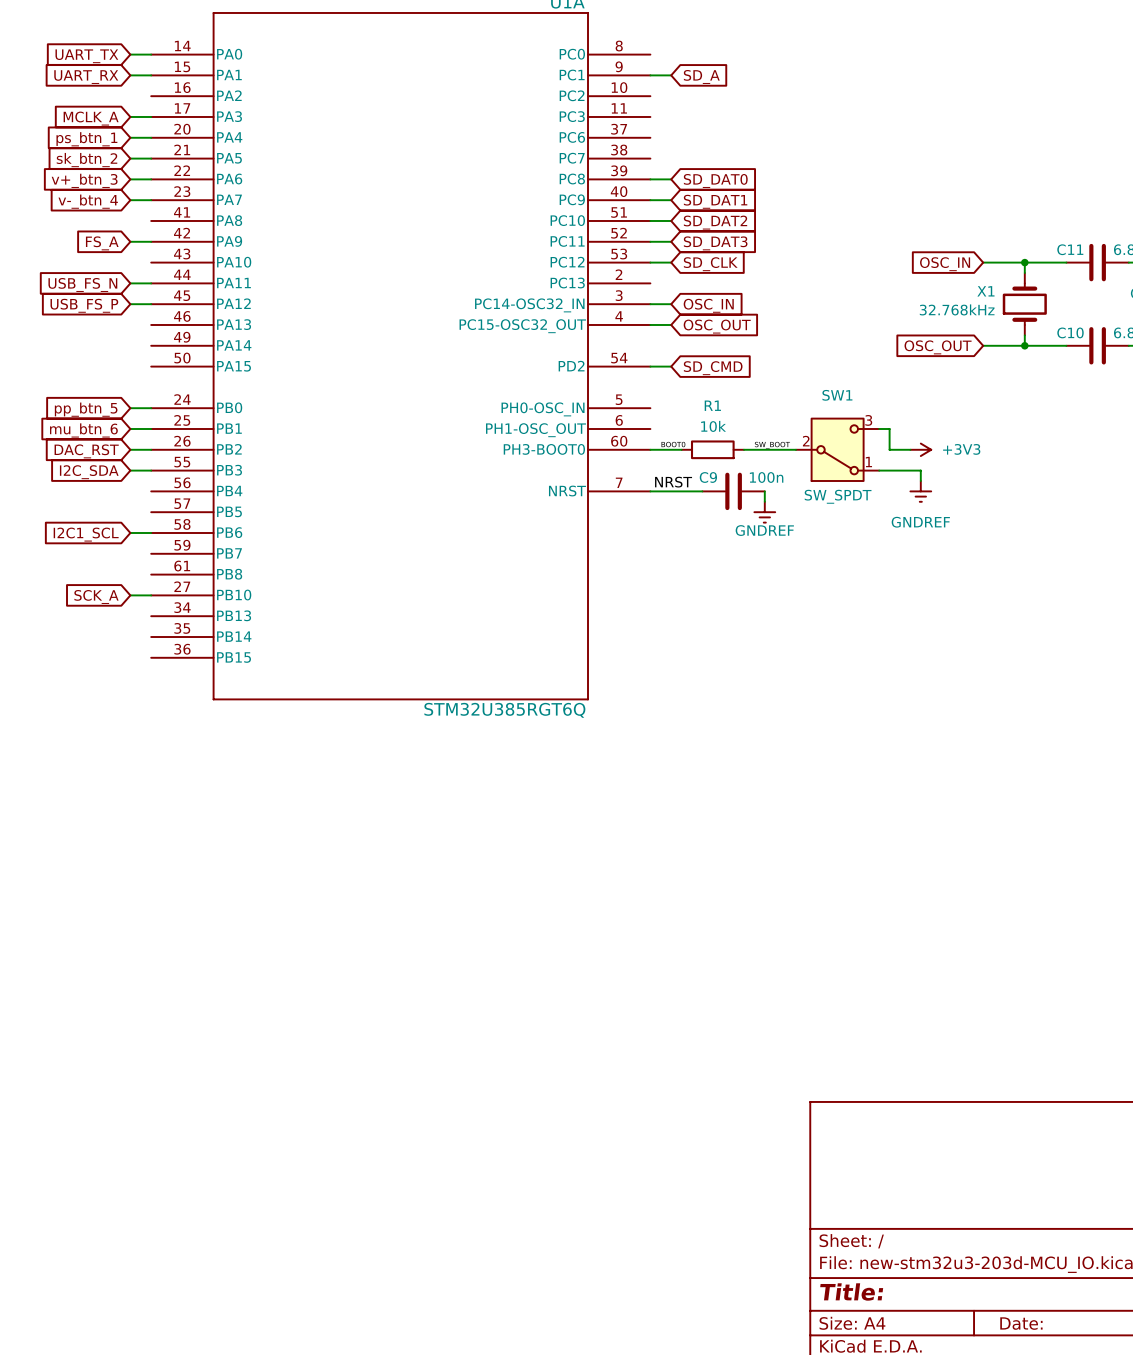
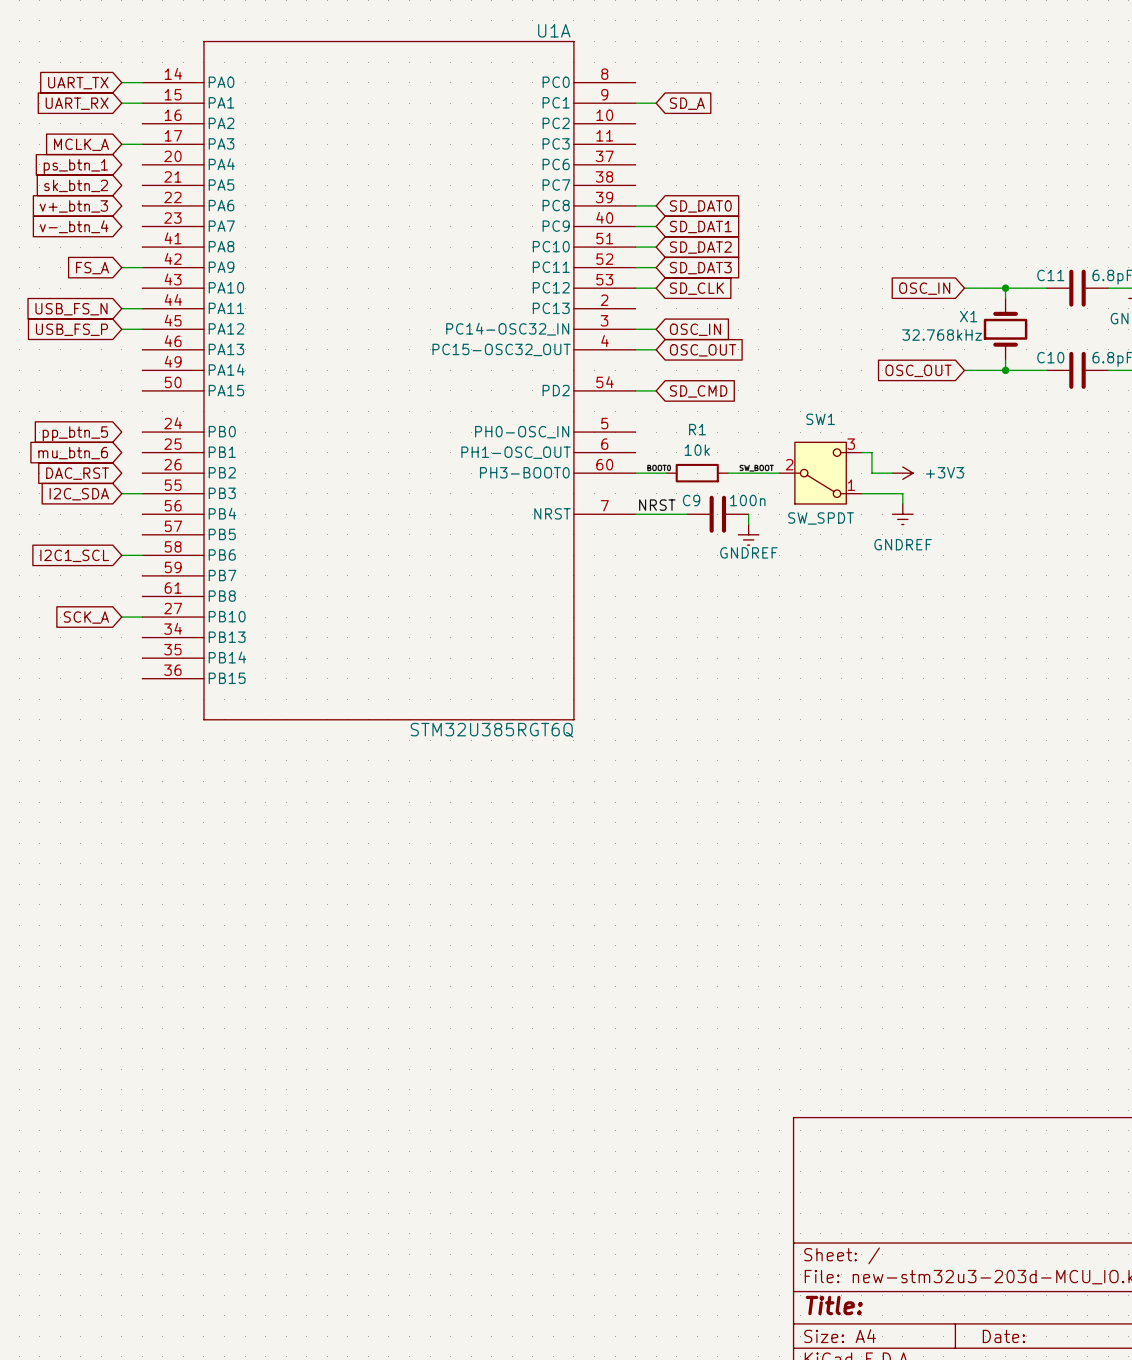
wire: (130, 137) (151, 137) -> none
wire: (130, 158) (151, 158) -> none
wire: (130, 179) (151, 179) -> none
wire: (130, 200) (151, 200) -> none
wire: (130, 408) (151, 408) -> none
wire: (130, 428) (151, 428) -> none
wire: (130, 449) (151, 449) -> none

